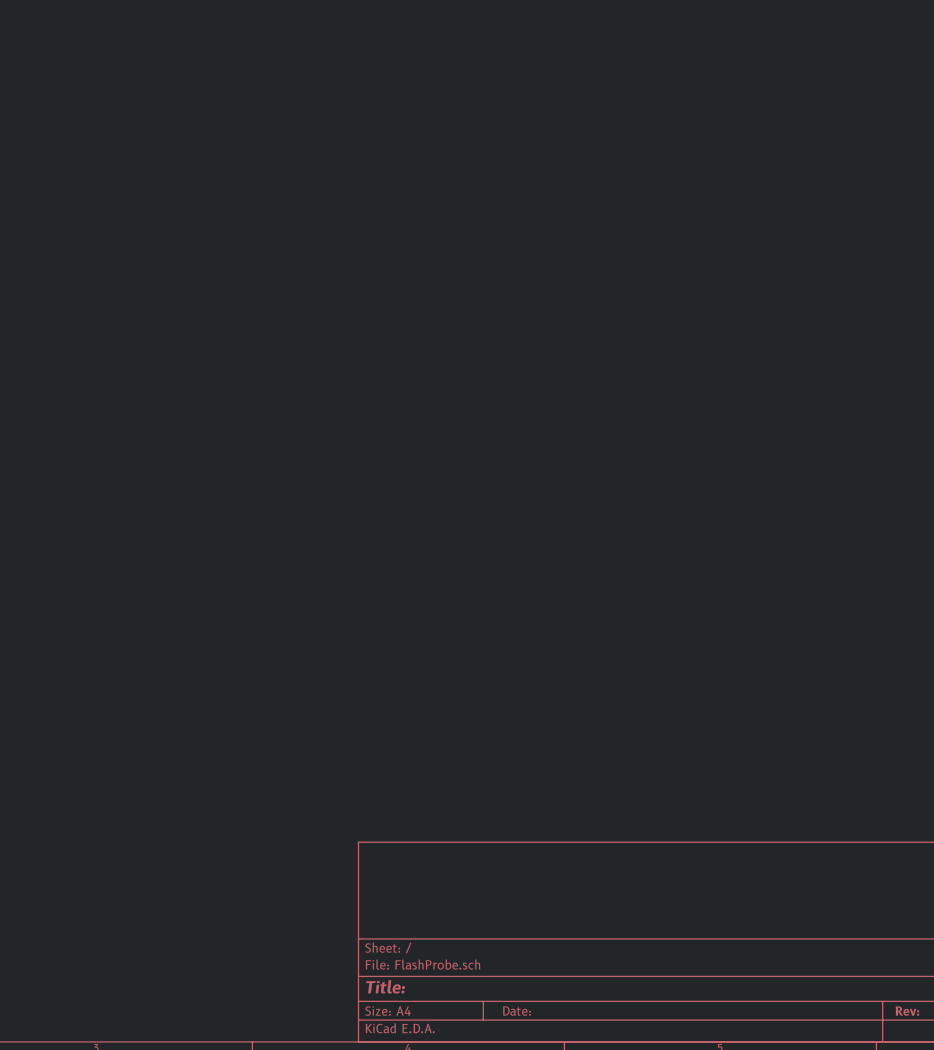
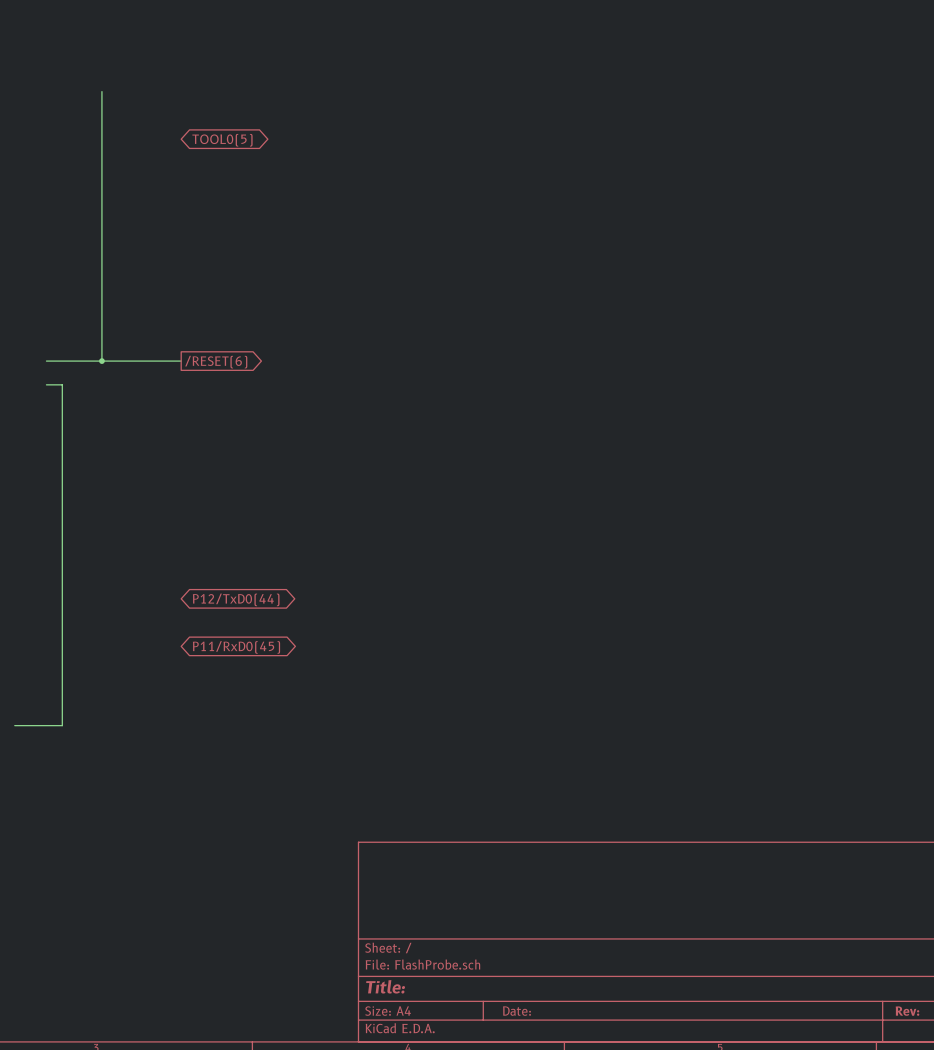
wire: none -> (101, 91) (101, 361)
global label: none -> TOOL0(5) (222, 140)
wire: none -> (46, 361) (181, 361)
junction: none -> (101, 361)
global label: none -> /RESET(6) (216, 362)
wire: none -> (46, 384) (62, 384) (62, 725) (14, 725)
global label: none -> P12/TxD0(44) (236, 599)
global label: none -> P11/RxD0(45) (236, 647)

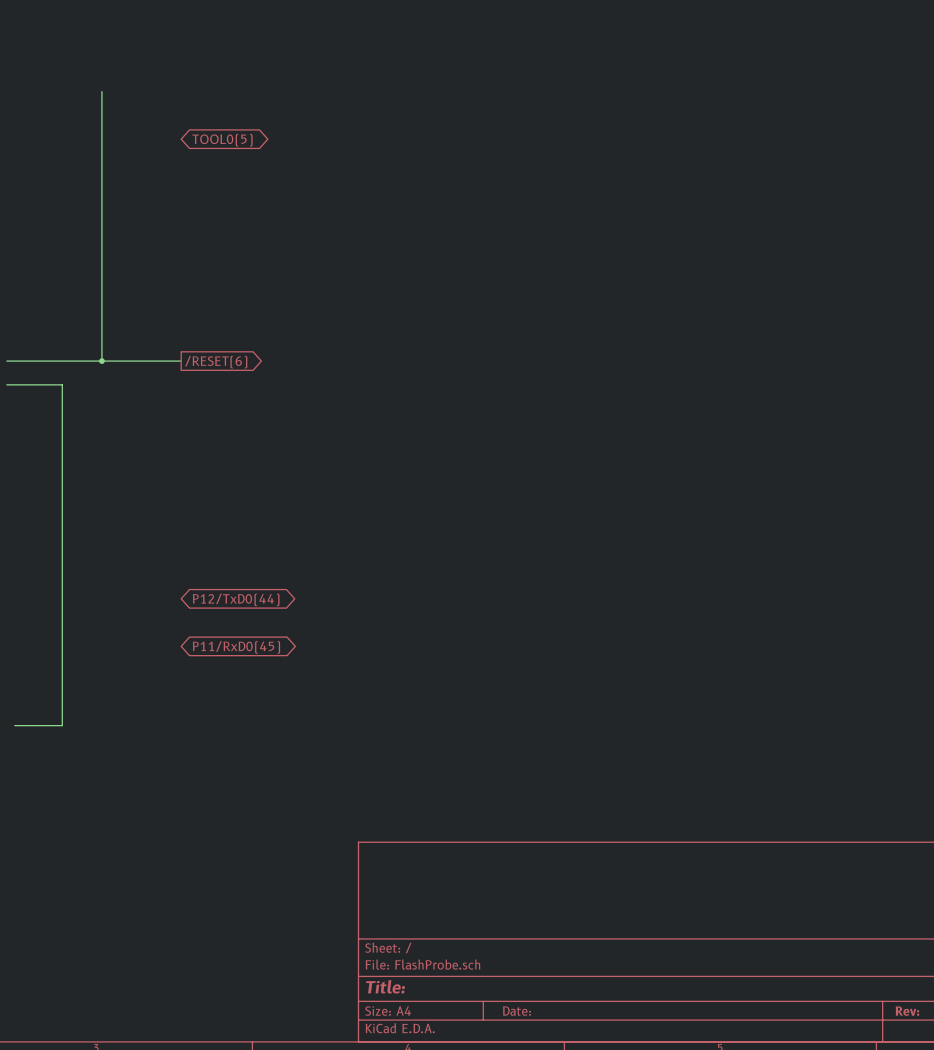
wire: none -> (6, 361) (46, 361)
wire: none -> (6, 384) (46, 384)

